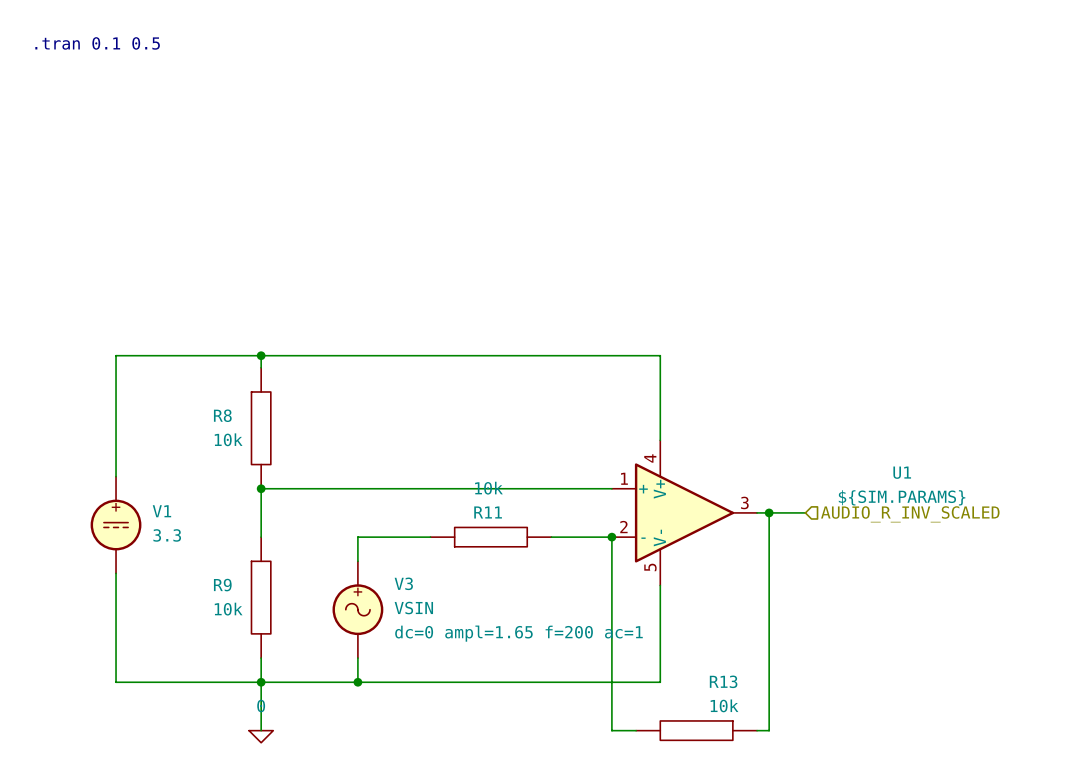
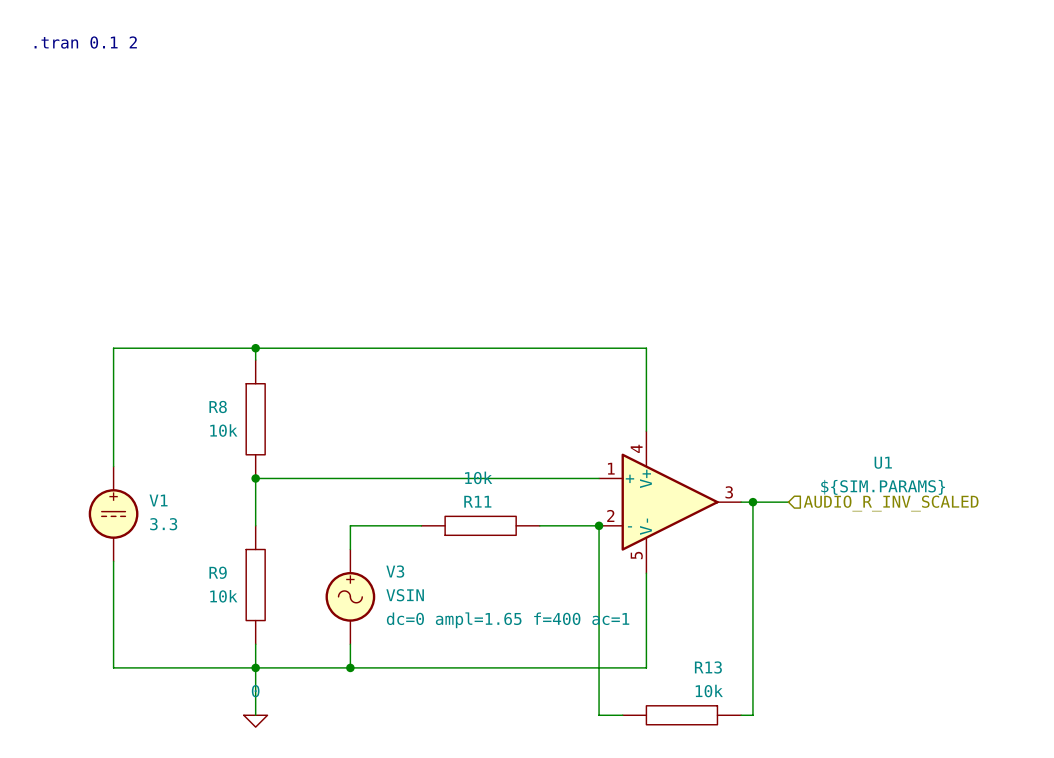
text: .tran 0.1 0.5 (97, 43) -> .tran 0.1 2 (85, 42)
V3 text: dc=0 ampl=1.65 f=200 ac=1 (518, 633) -> dc=0 ampl=1.65 f=400 ac=1 (508, 620)

